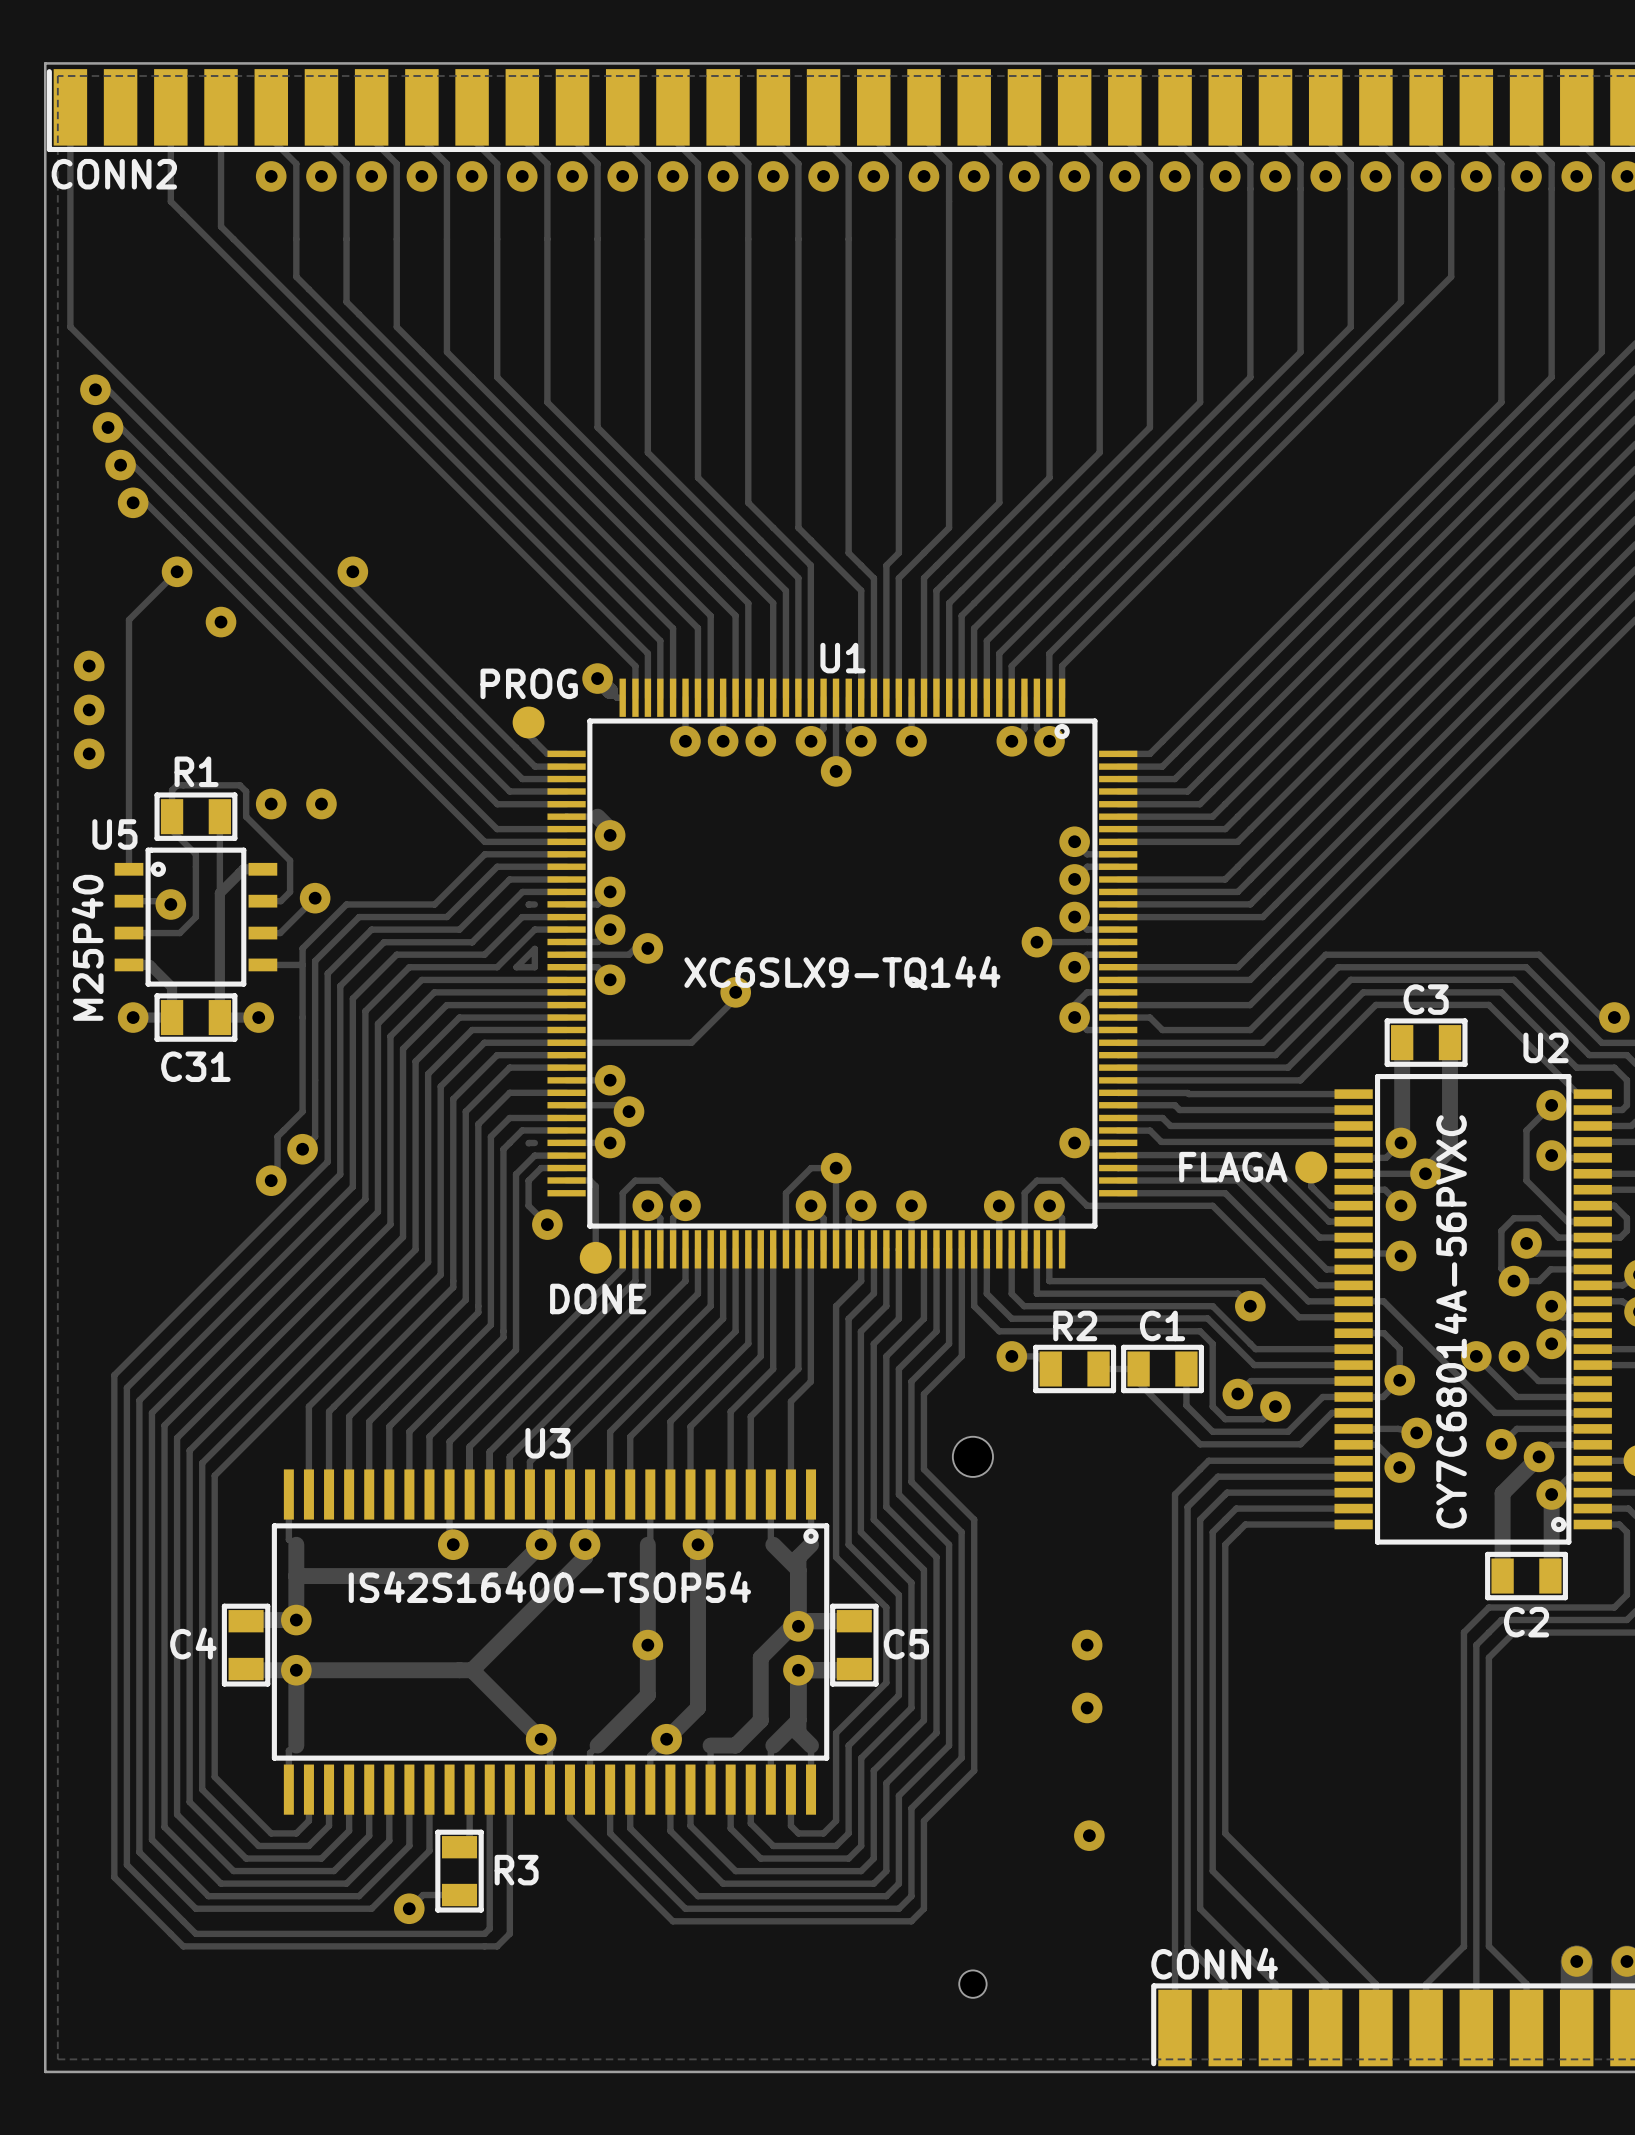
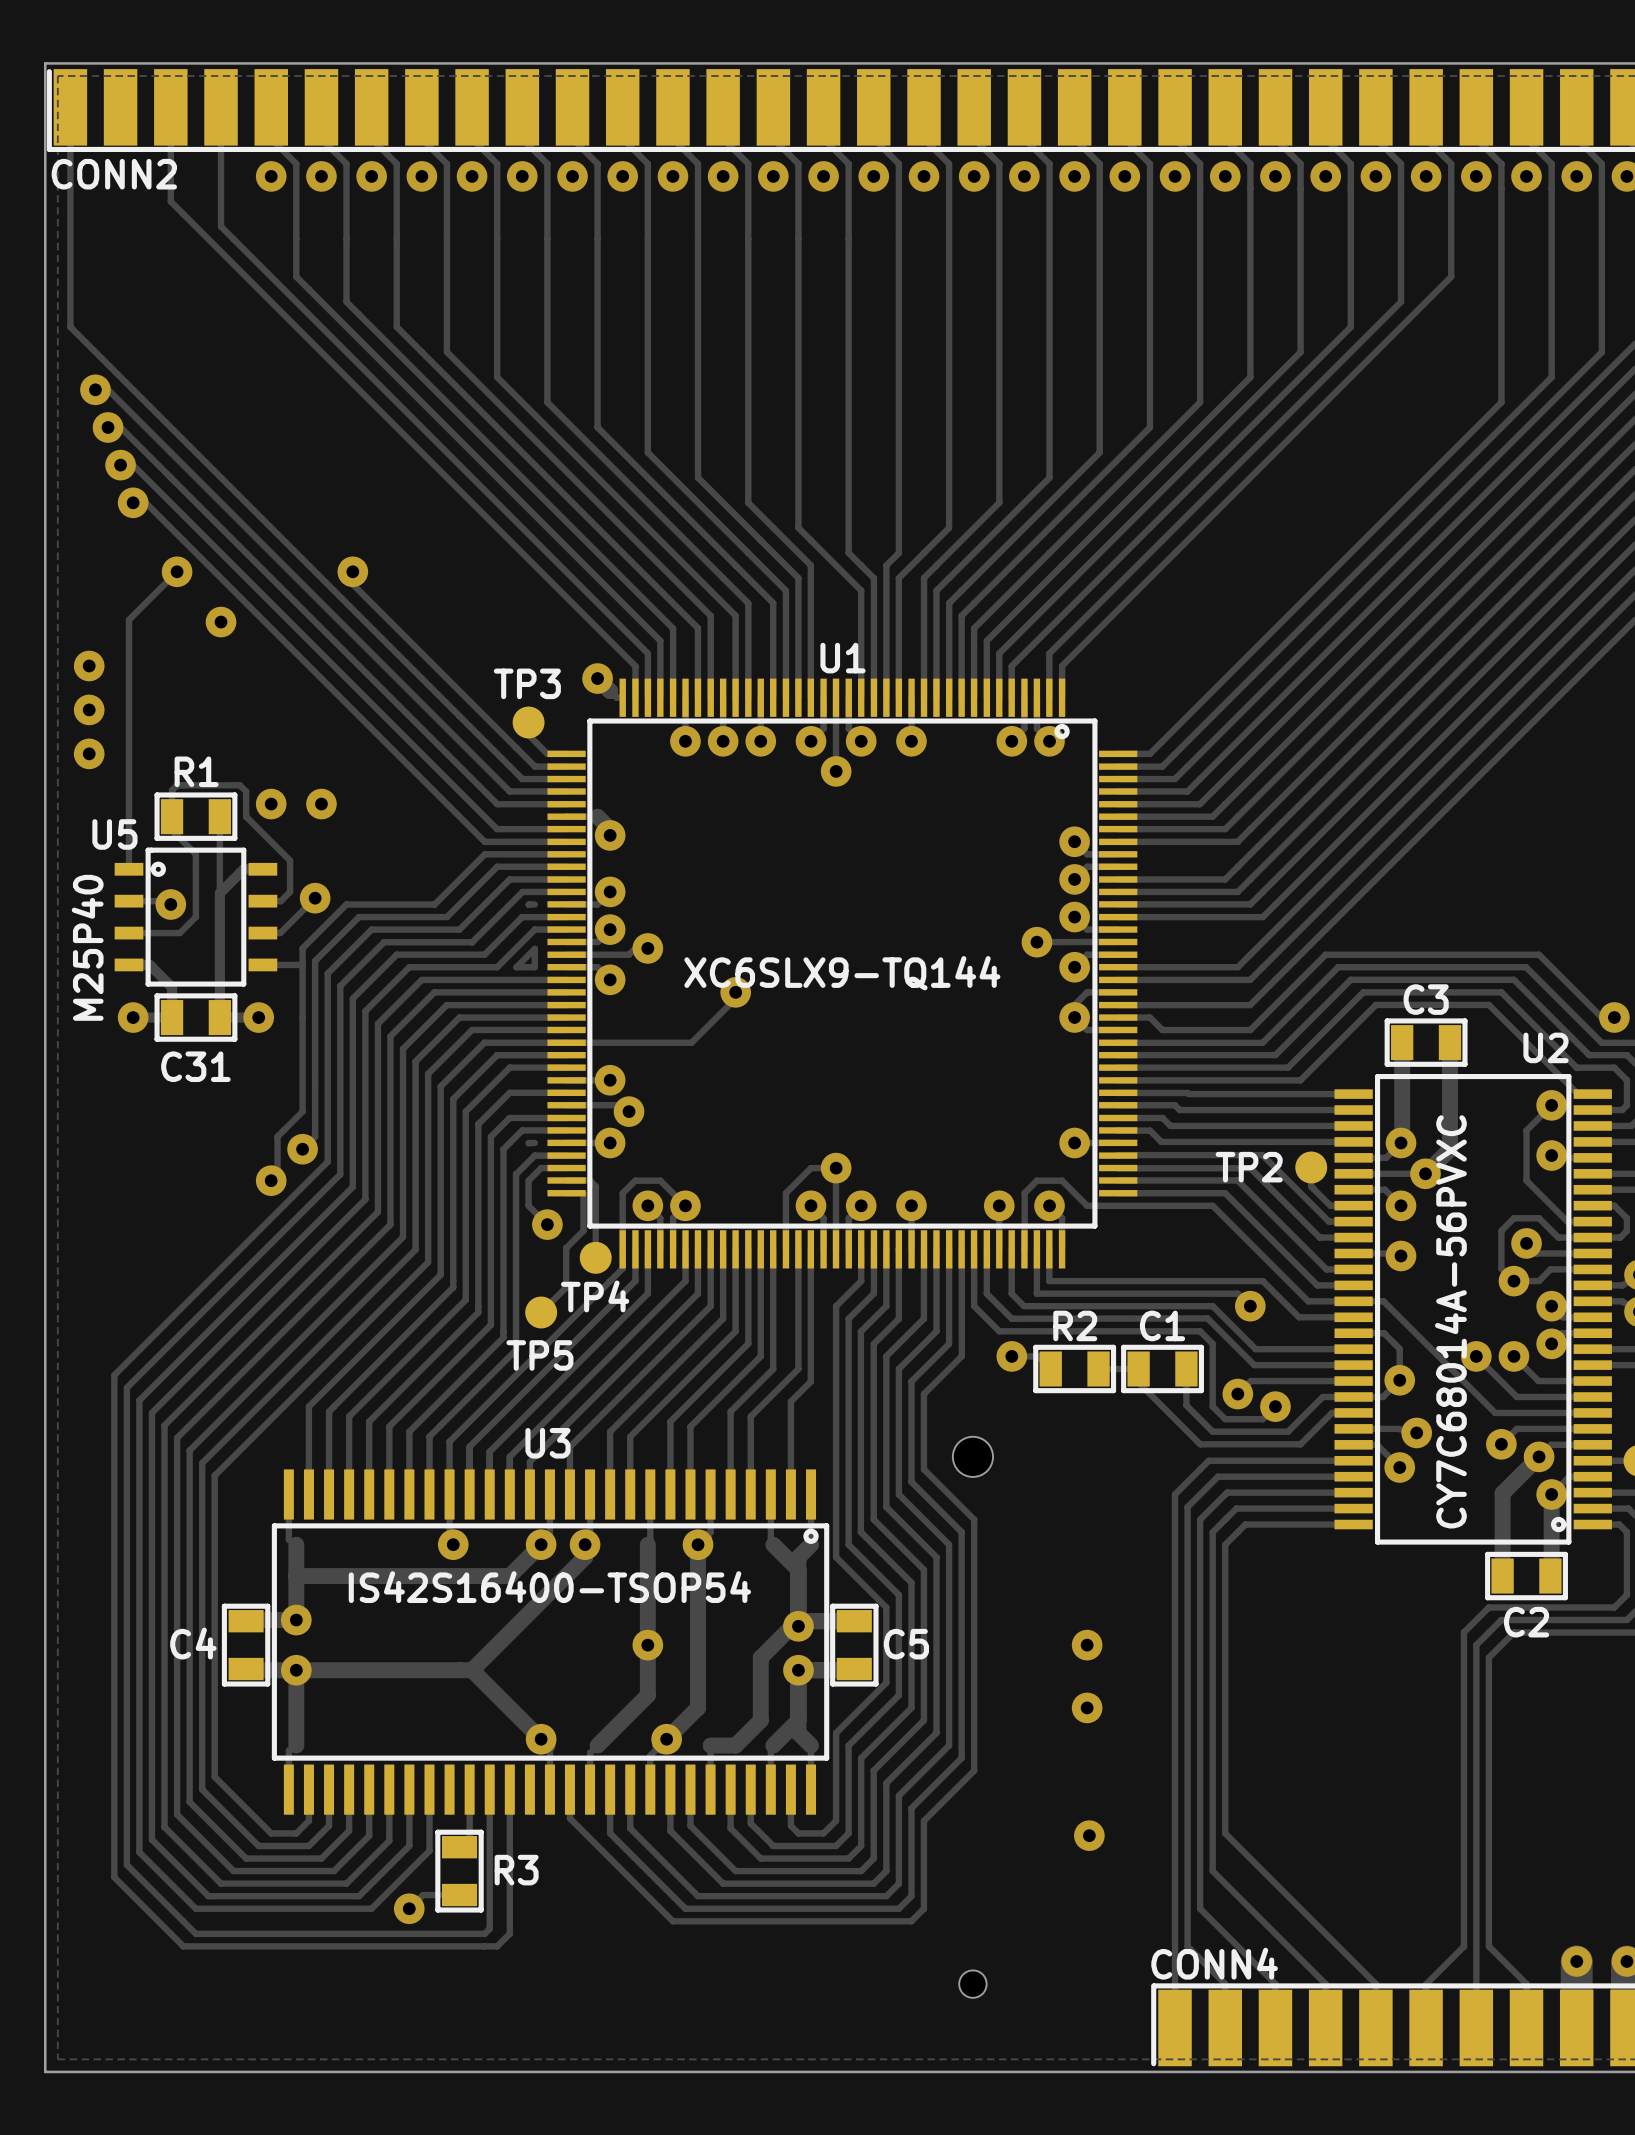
TP3 name: none -> TP3 (527, 683)
TP3 value: PROG (529, 683) -> none
TP2 value: FLAGA (1233, 1167) -> none
TP2 name: none -> TP2 (1249, 1167)
track: none -> (566, 1193) (583, 1193) (583, 1230) (566, 1248) (566, 1287) (541, 1312)
TP4 name: none -> TP4 (595, 1296)
TP4 value: DONE (598, 1298) -> none
TP5: none -> (541, 1312)

